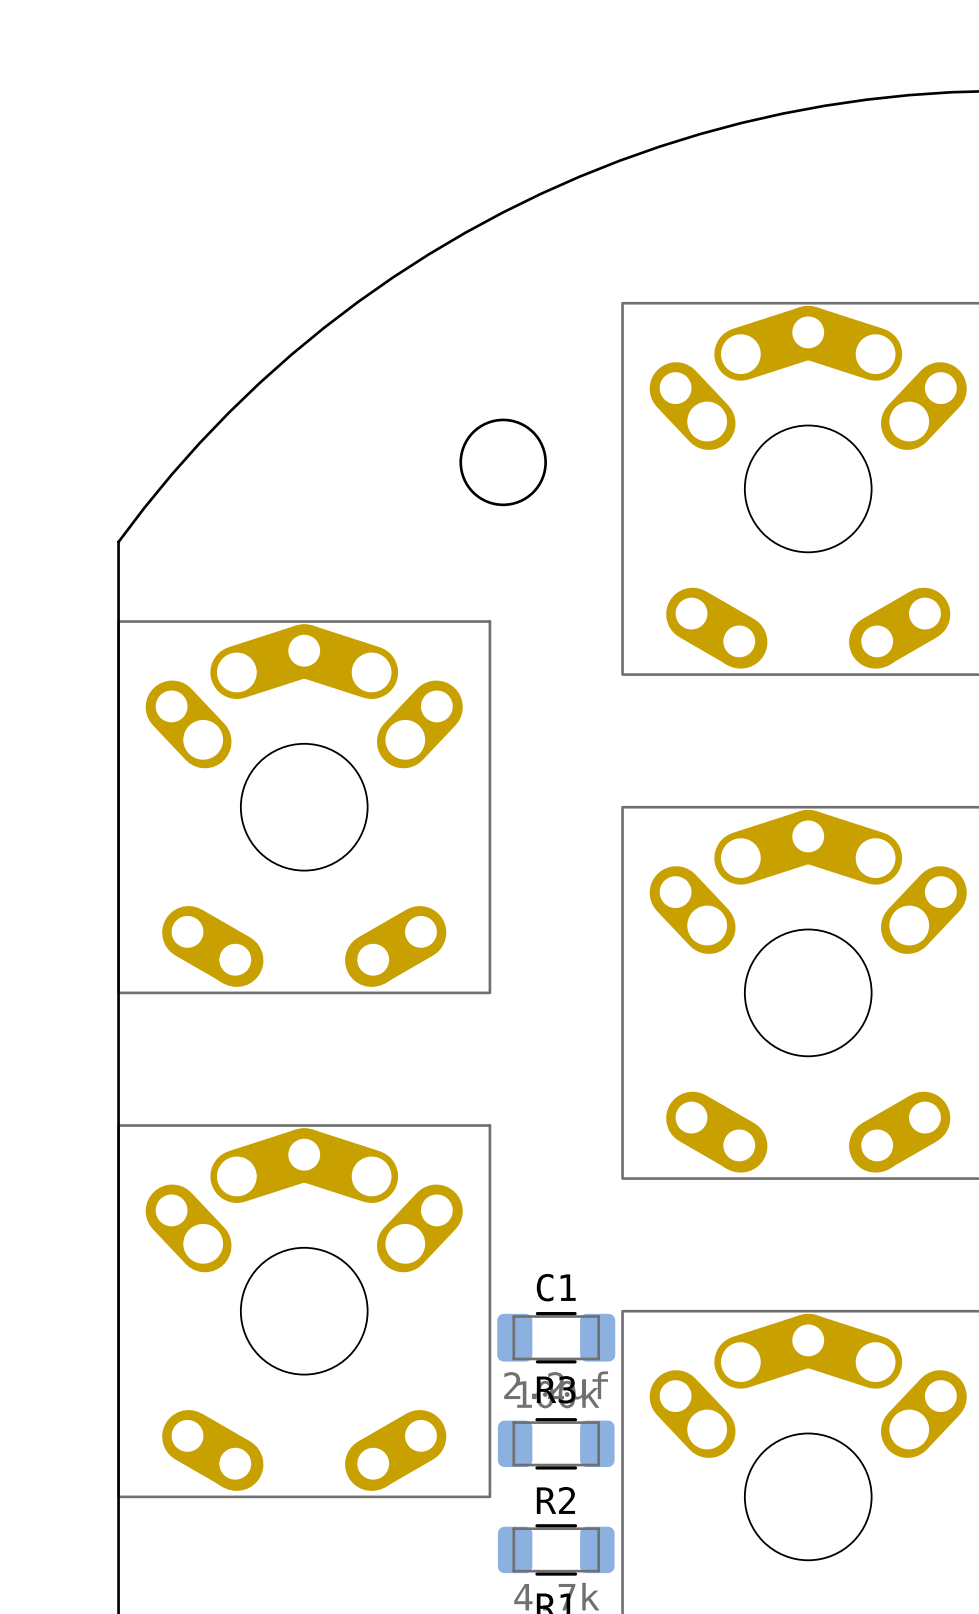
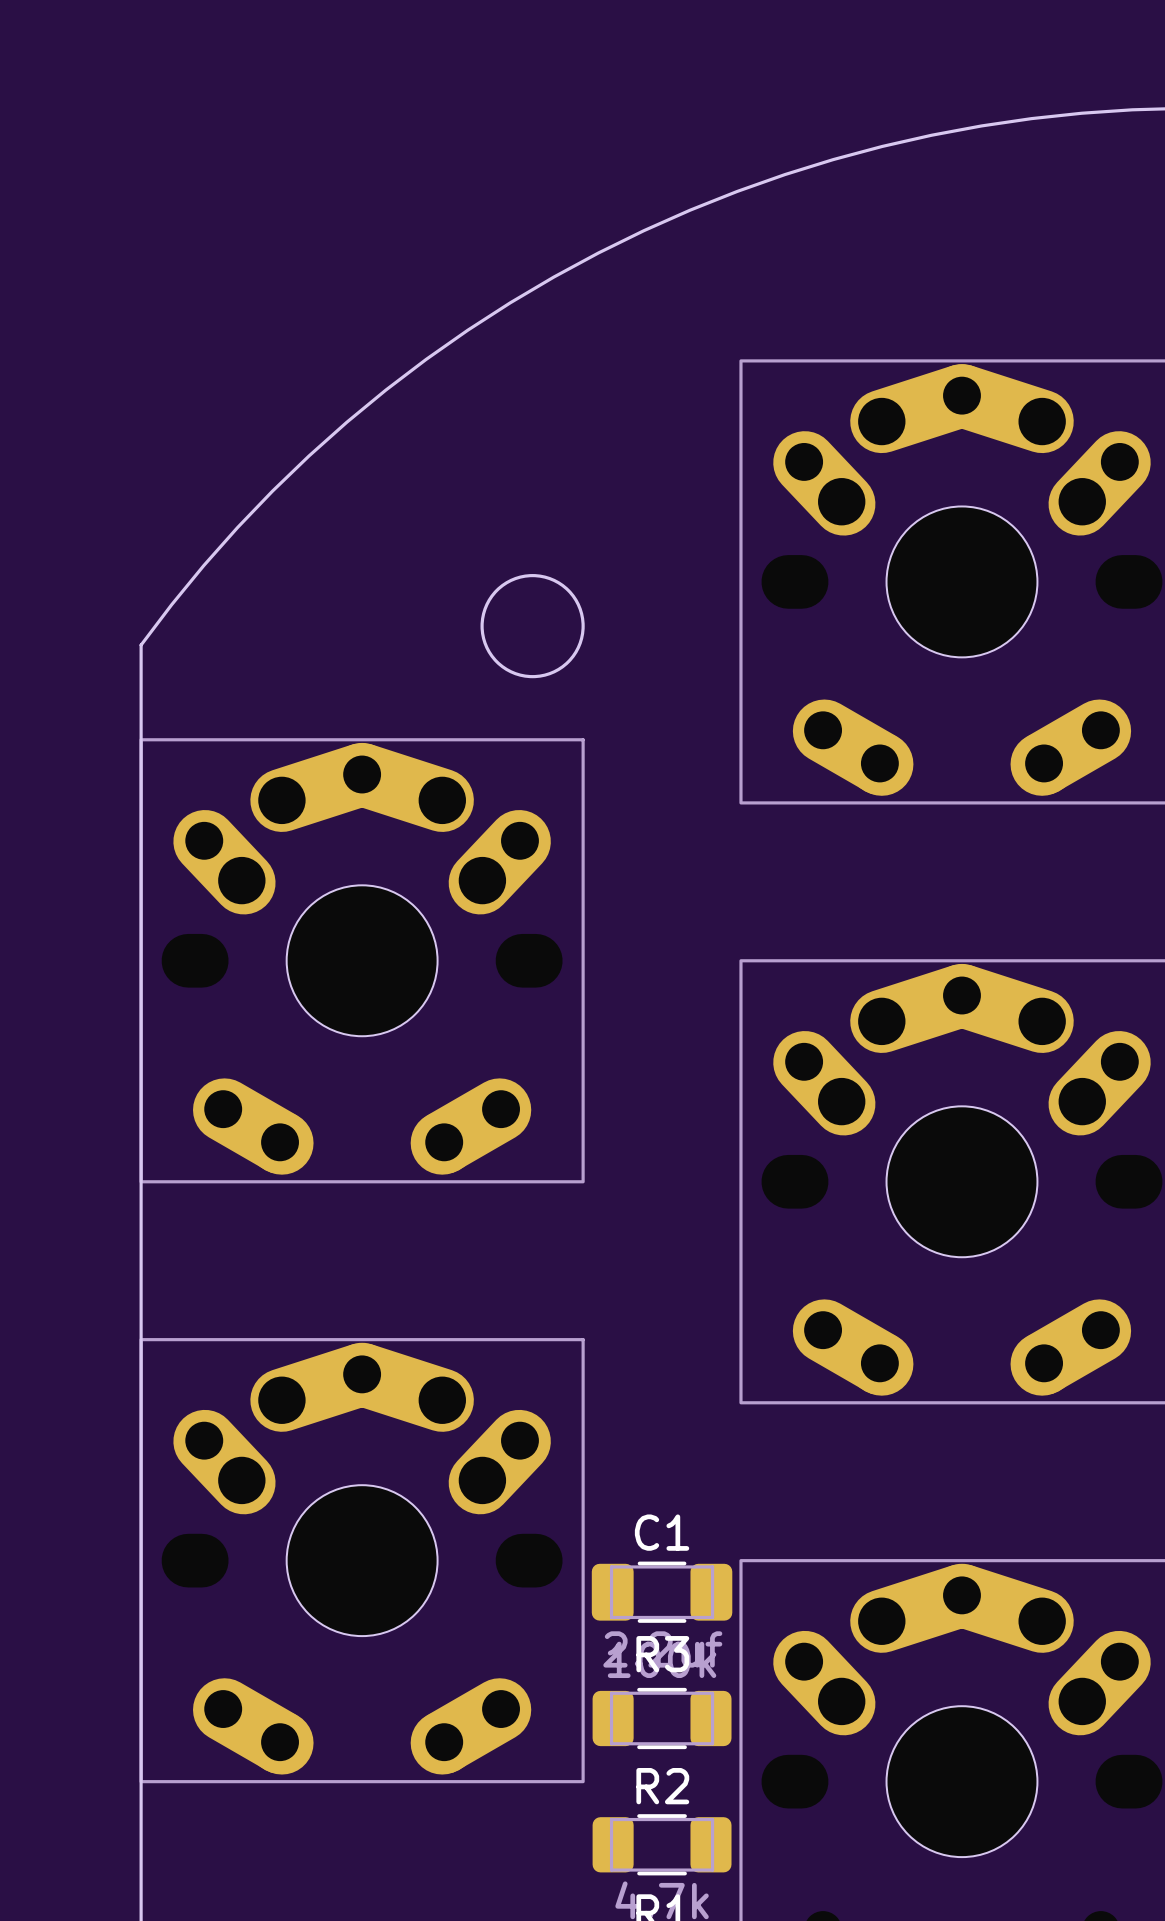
round board edge position: (503, 462) -> (532, 626)

